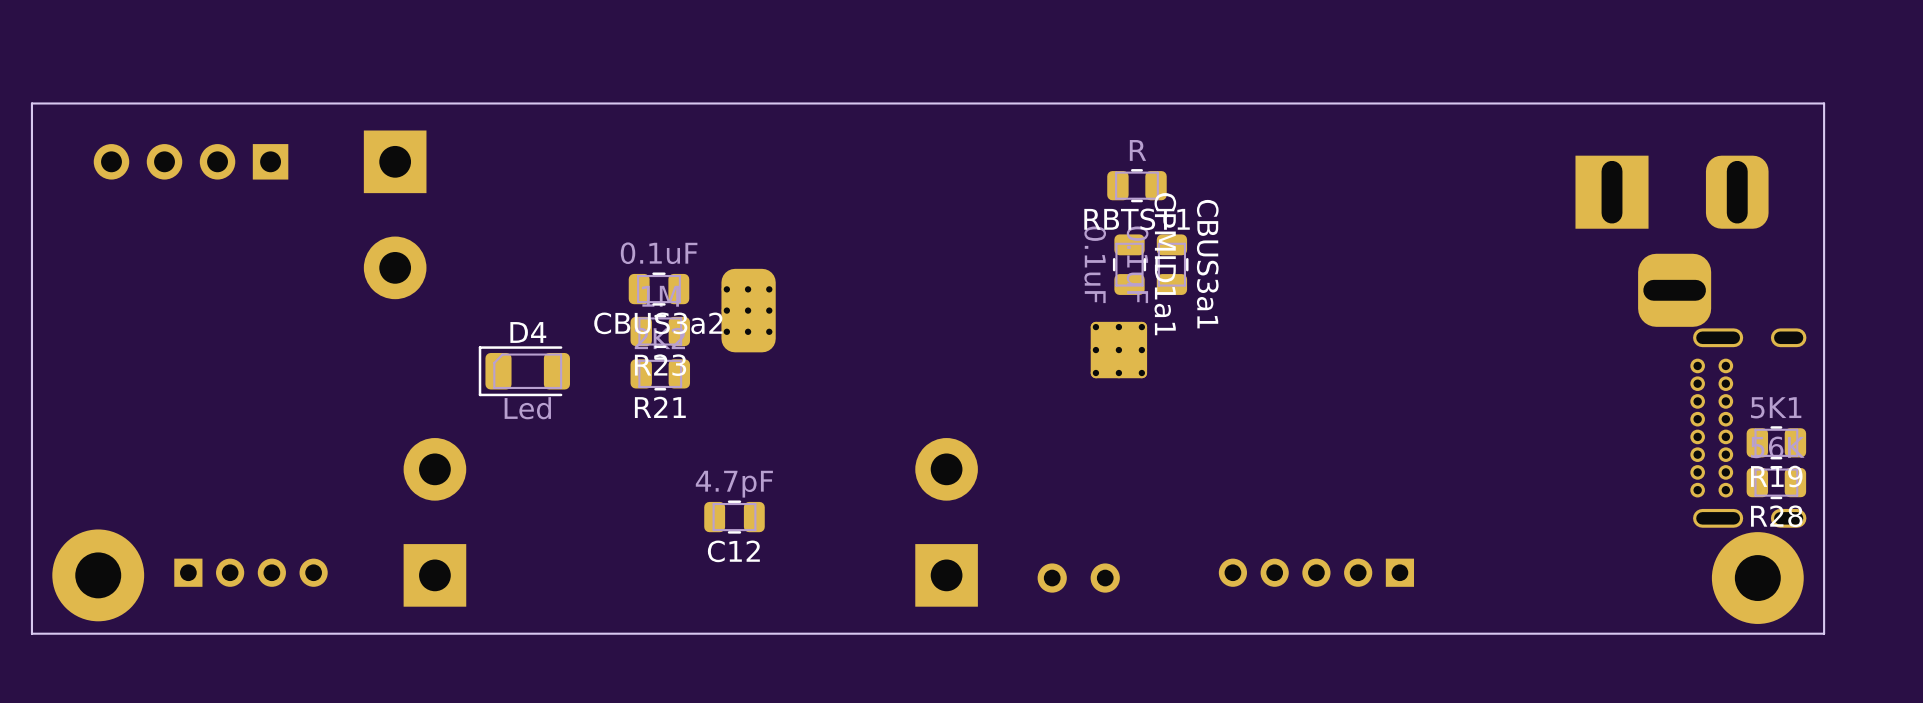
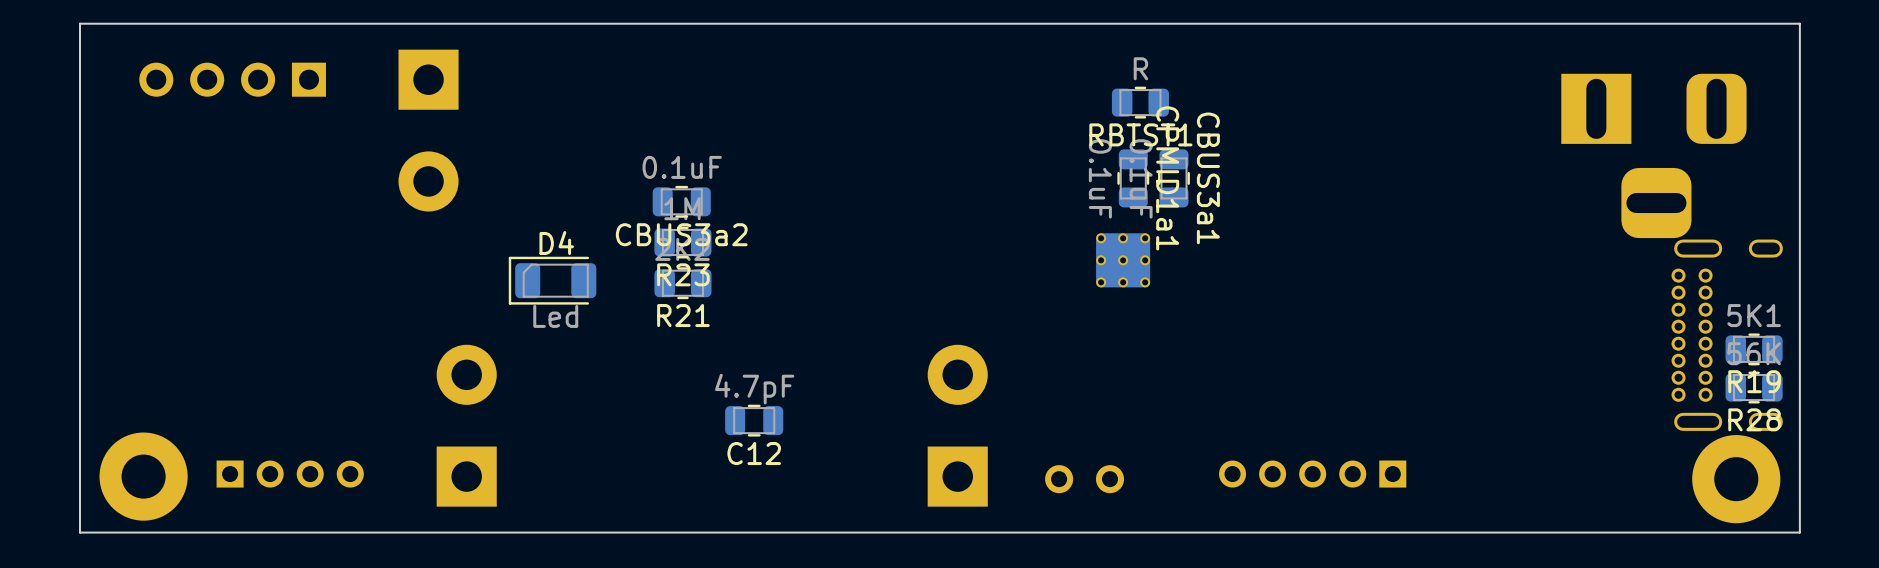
part: (748, 310) -> none

